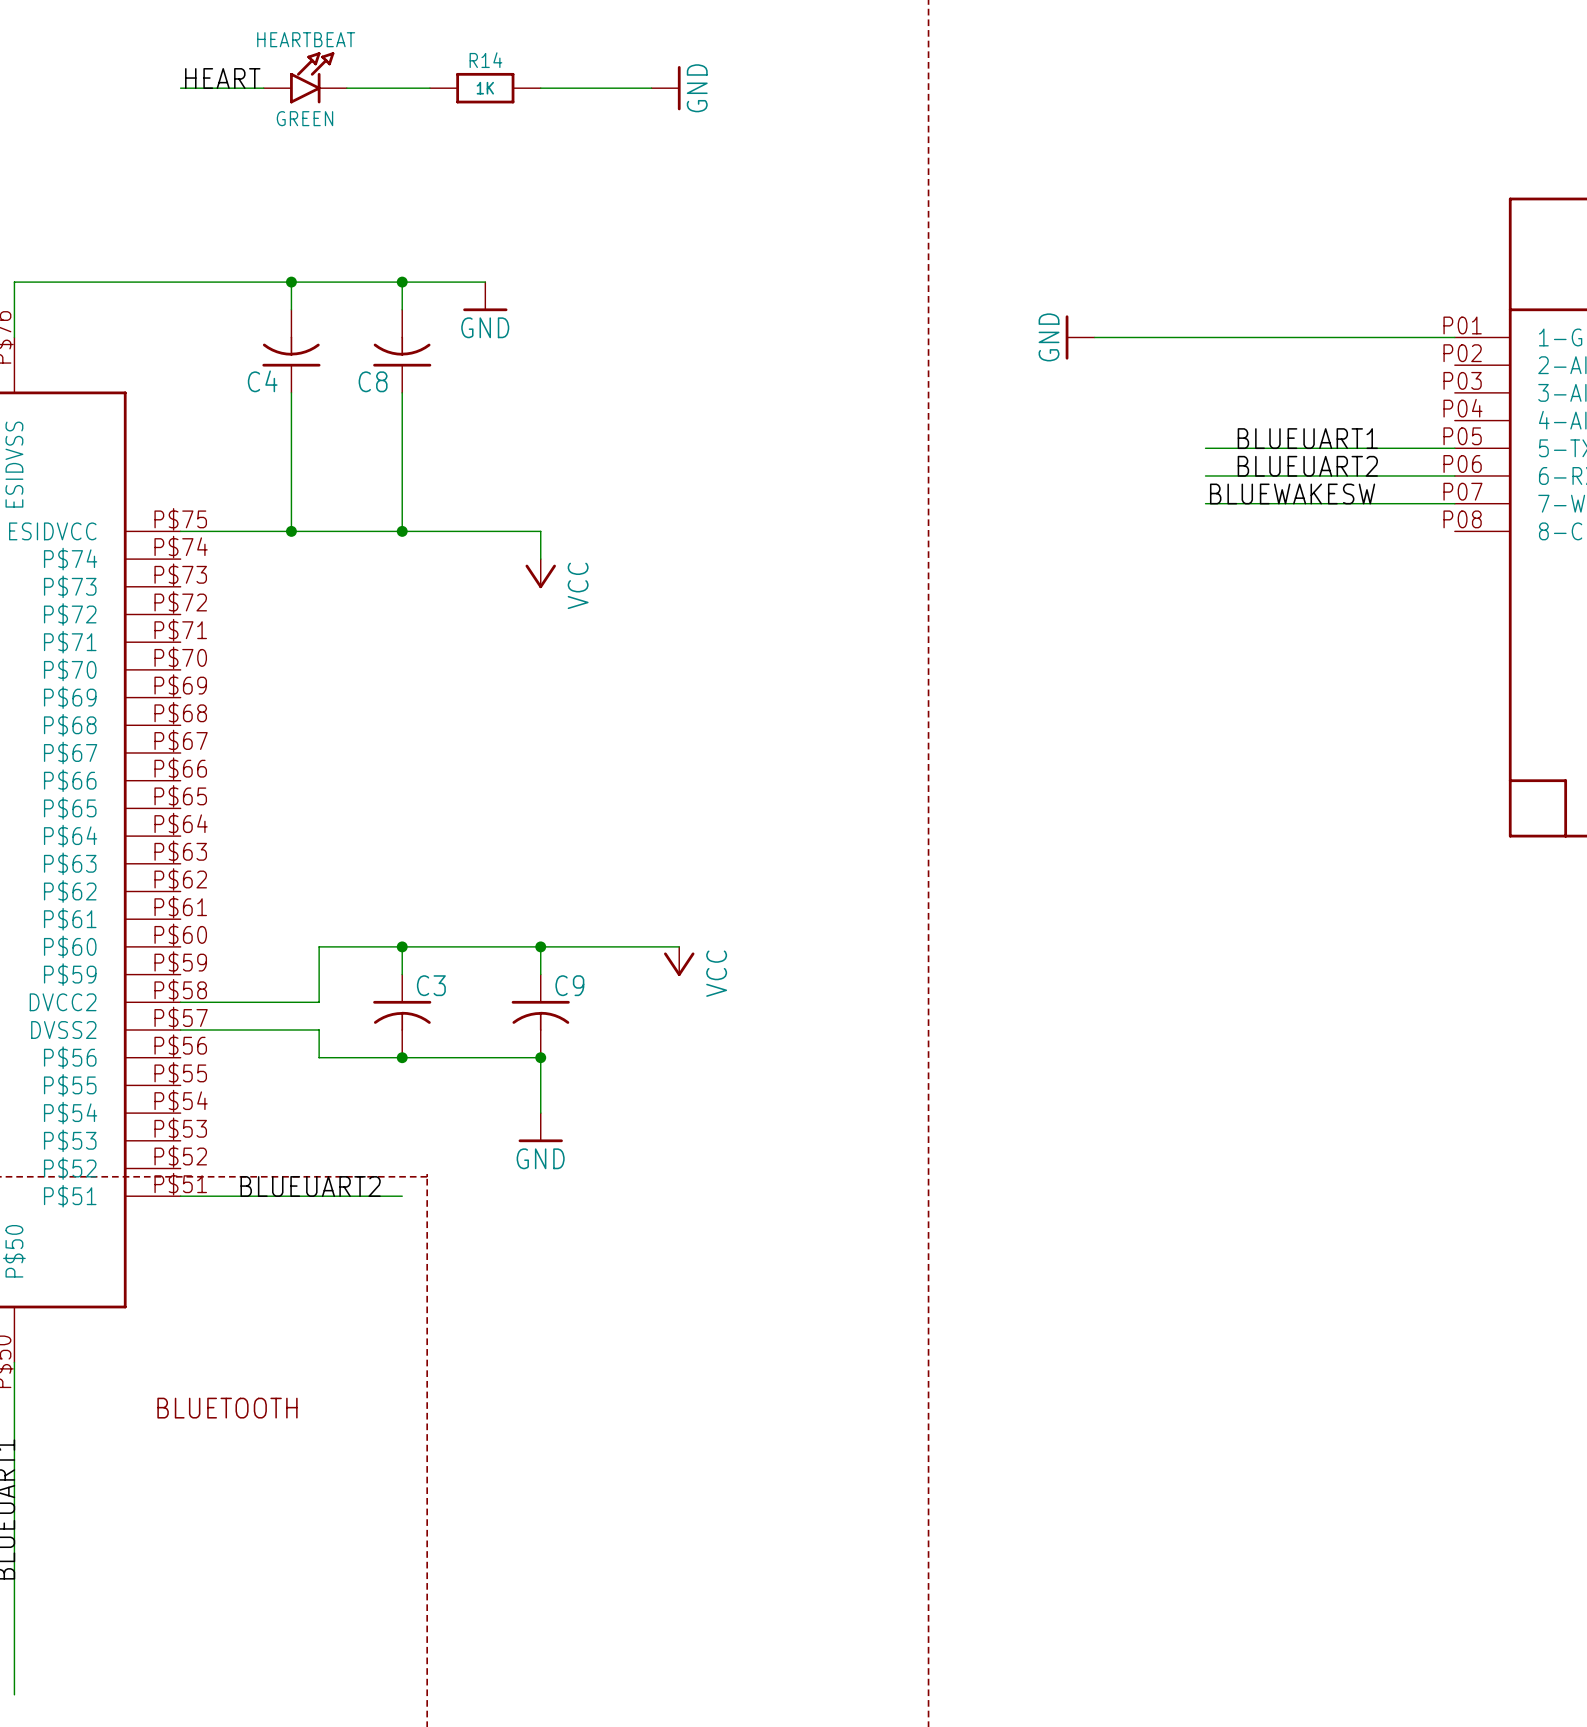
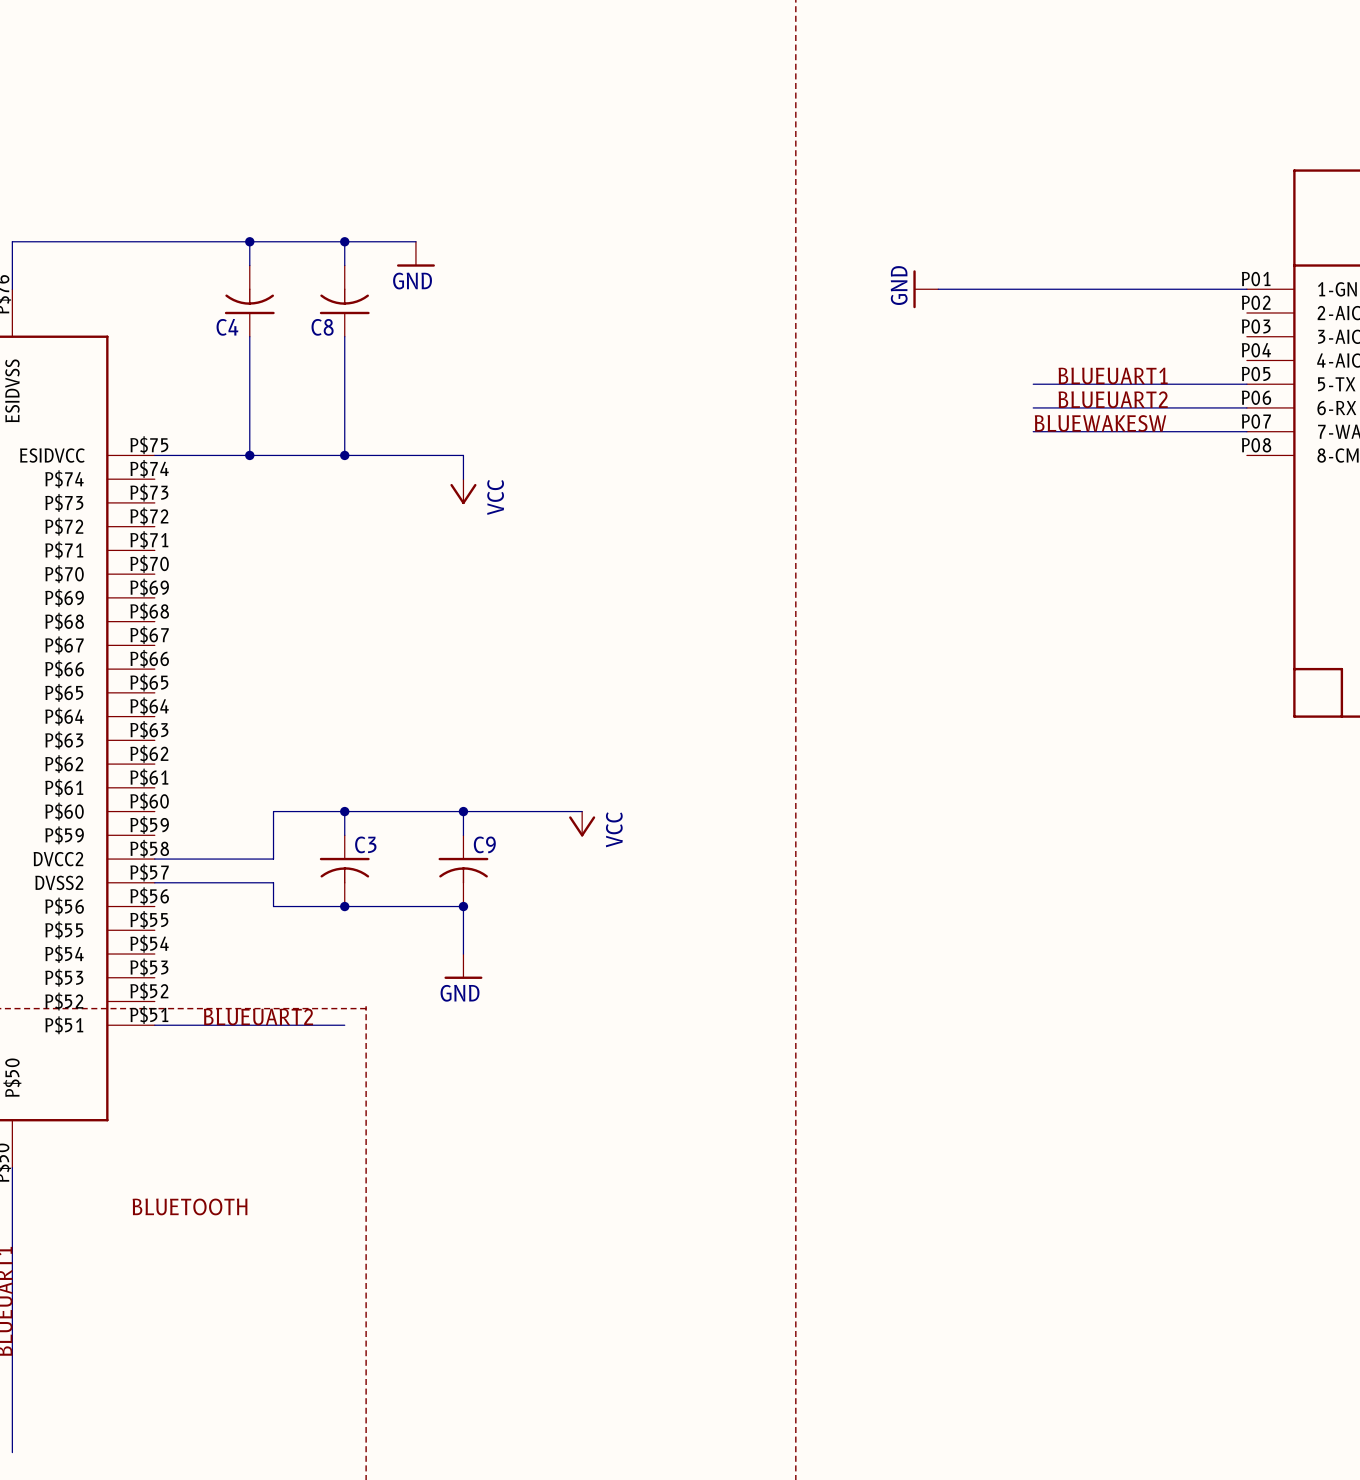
HEARTBEAT: GREEN (305, 77) -> none
label: HEART (222, 78) -> none
wire: (180, 88) (263, 88) -> none
wire: (346, 88) (429, 88) -> none
R14: 1K (485, 88) -> none
wire: (540, 88) (651, 88) -> none
power symbol: GND (666, 88) -> none

